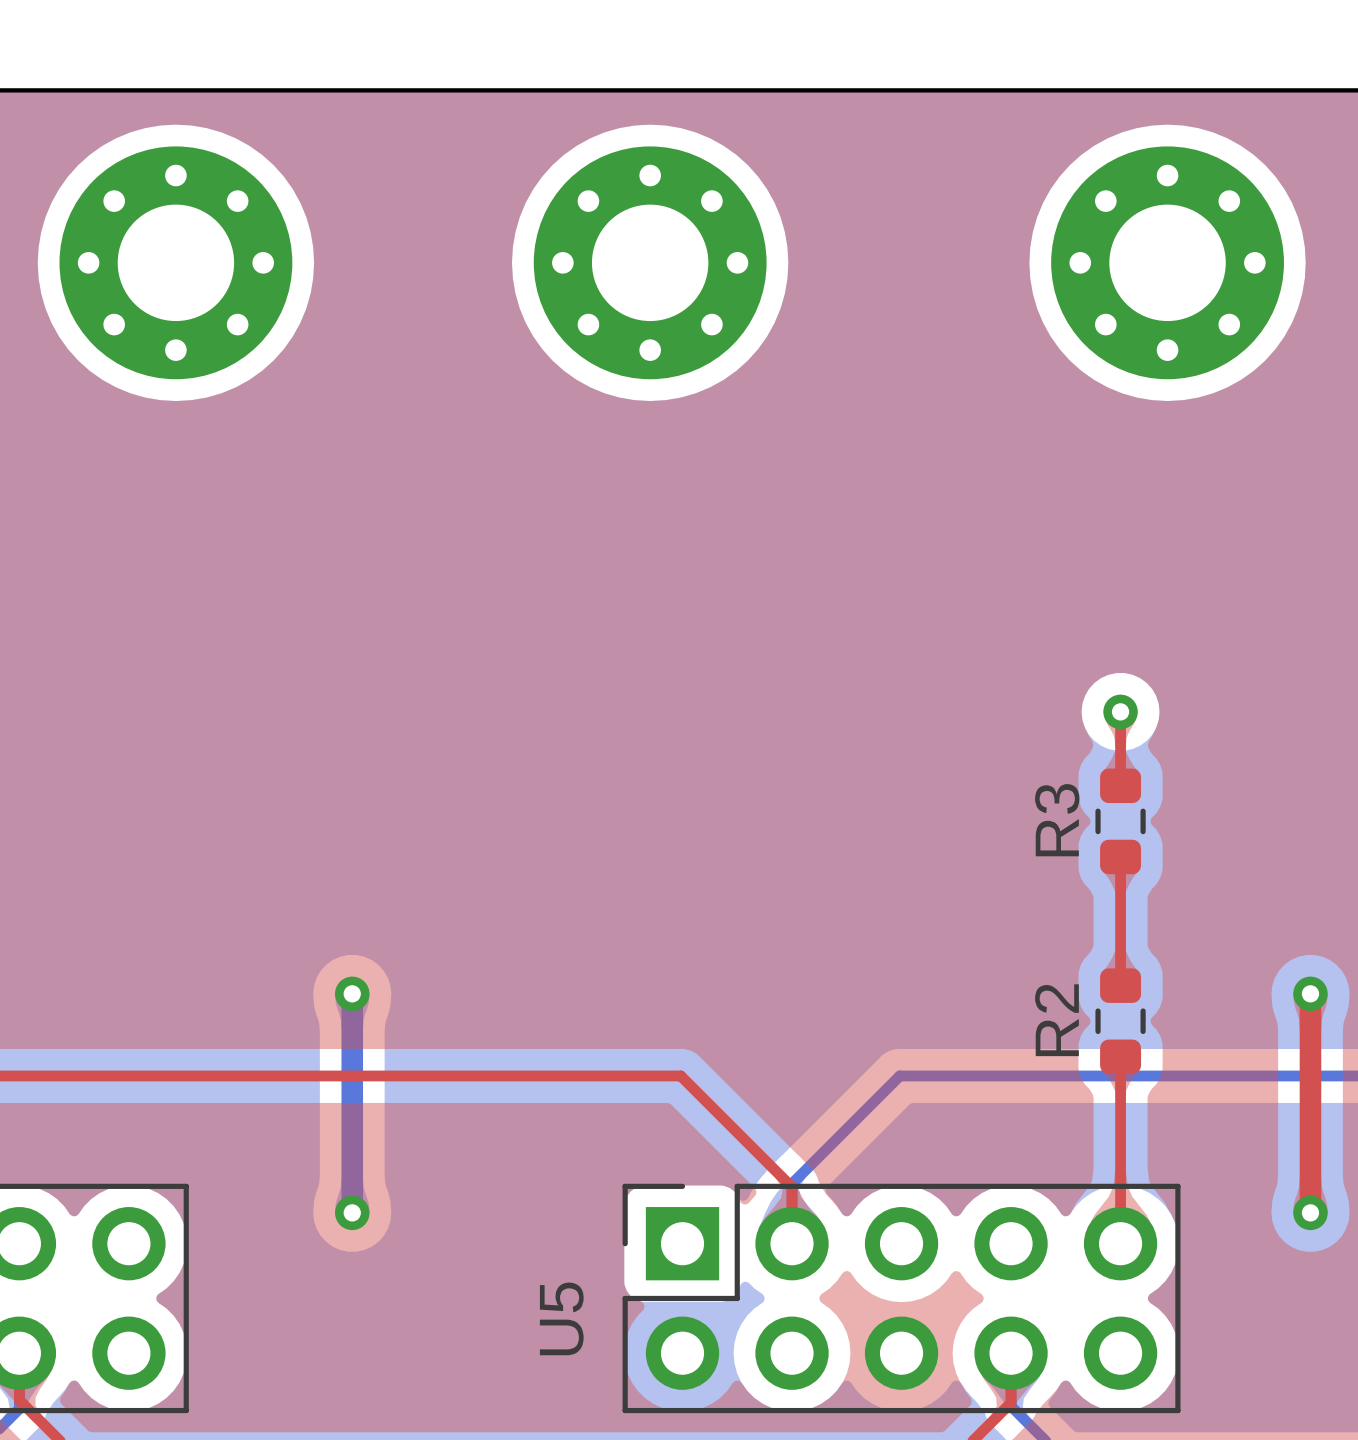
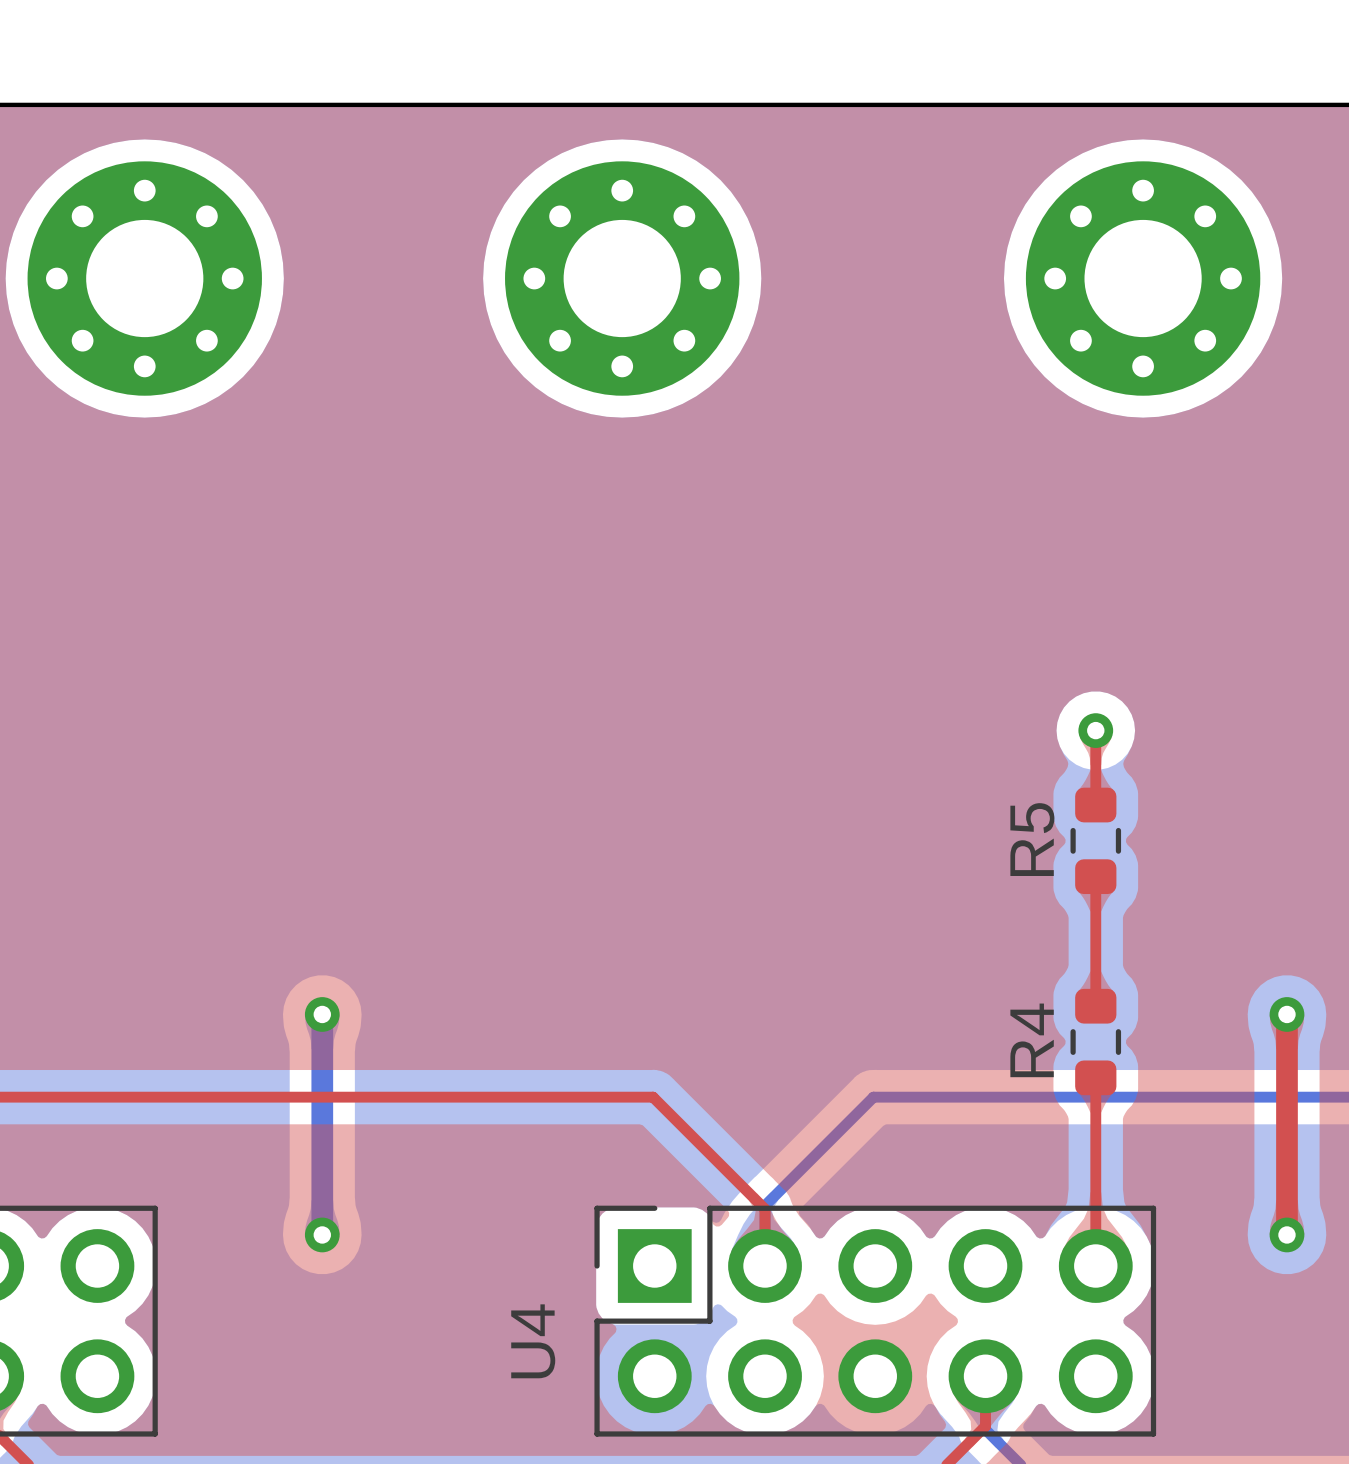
R3 name: R3 (1057, 820) -> R5 (1032, 839)
R2 name: R2 (1056, 1020) -> R4 (1032, 1040)
U5 name: U5 (561, 1318) -> U4 (533, 1341)

